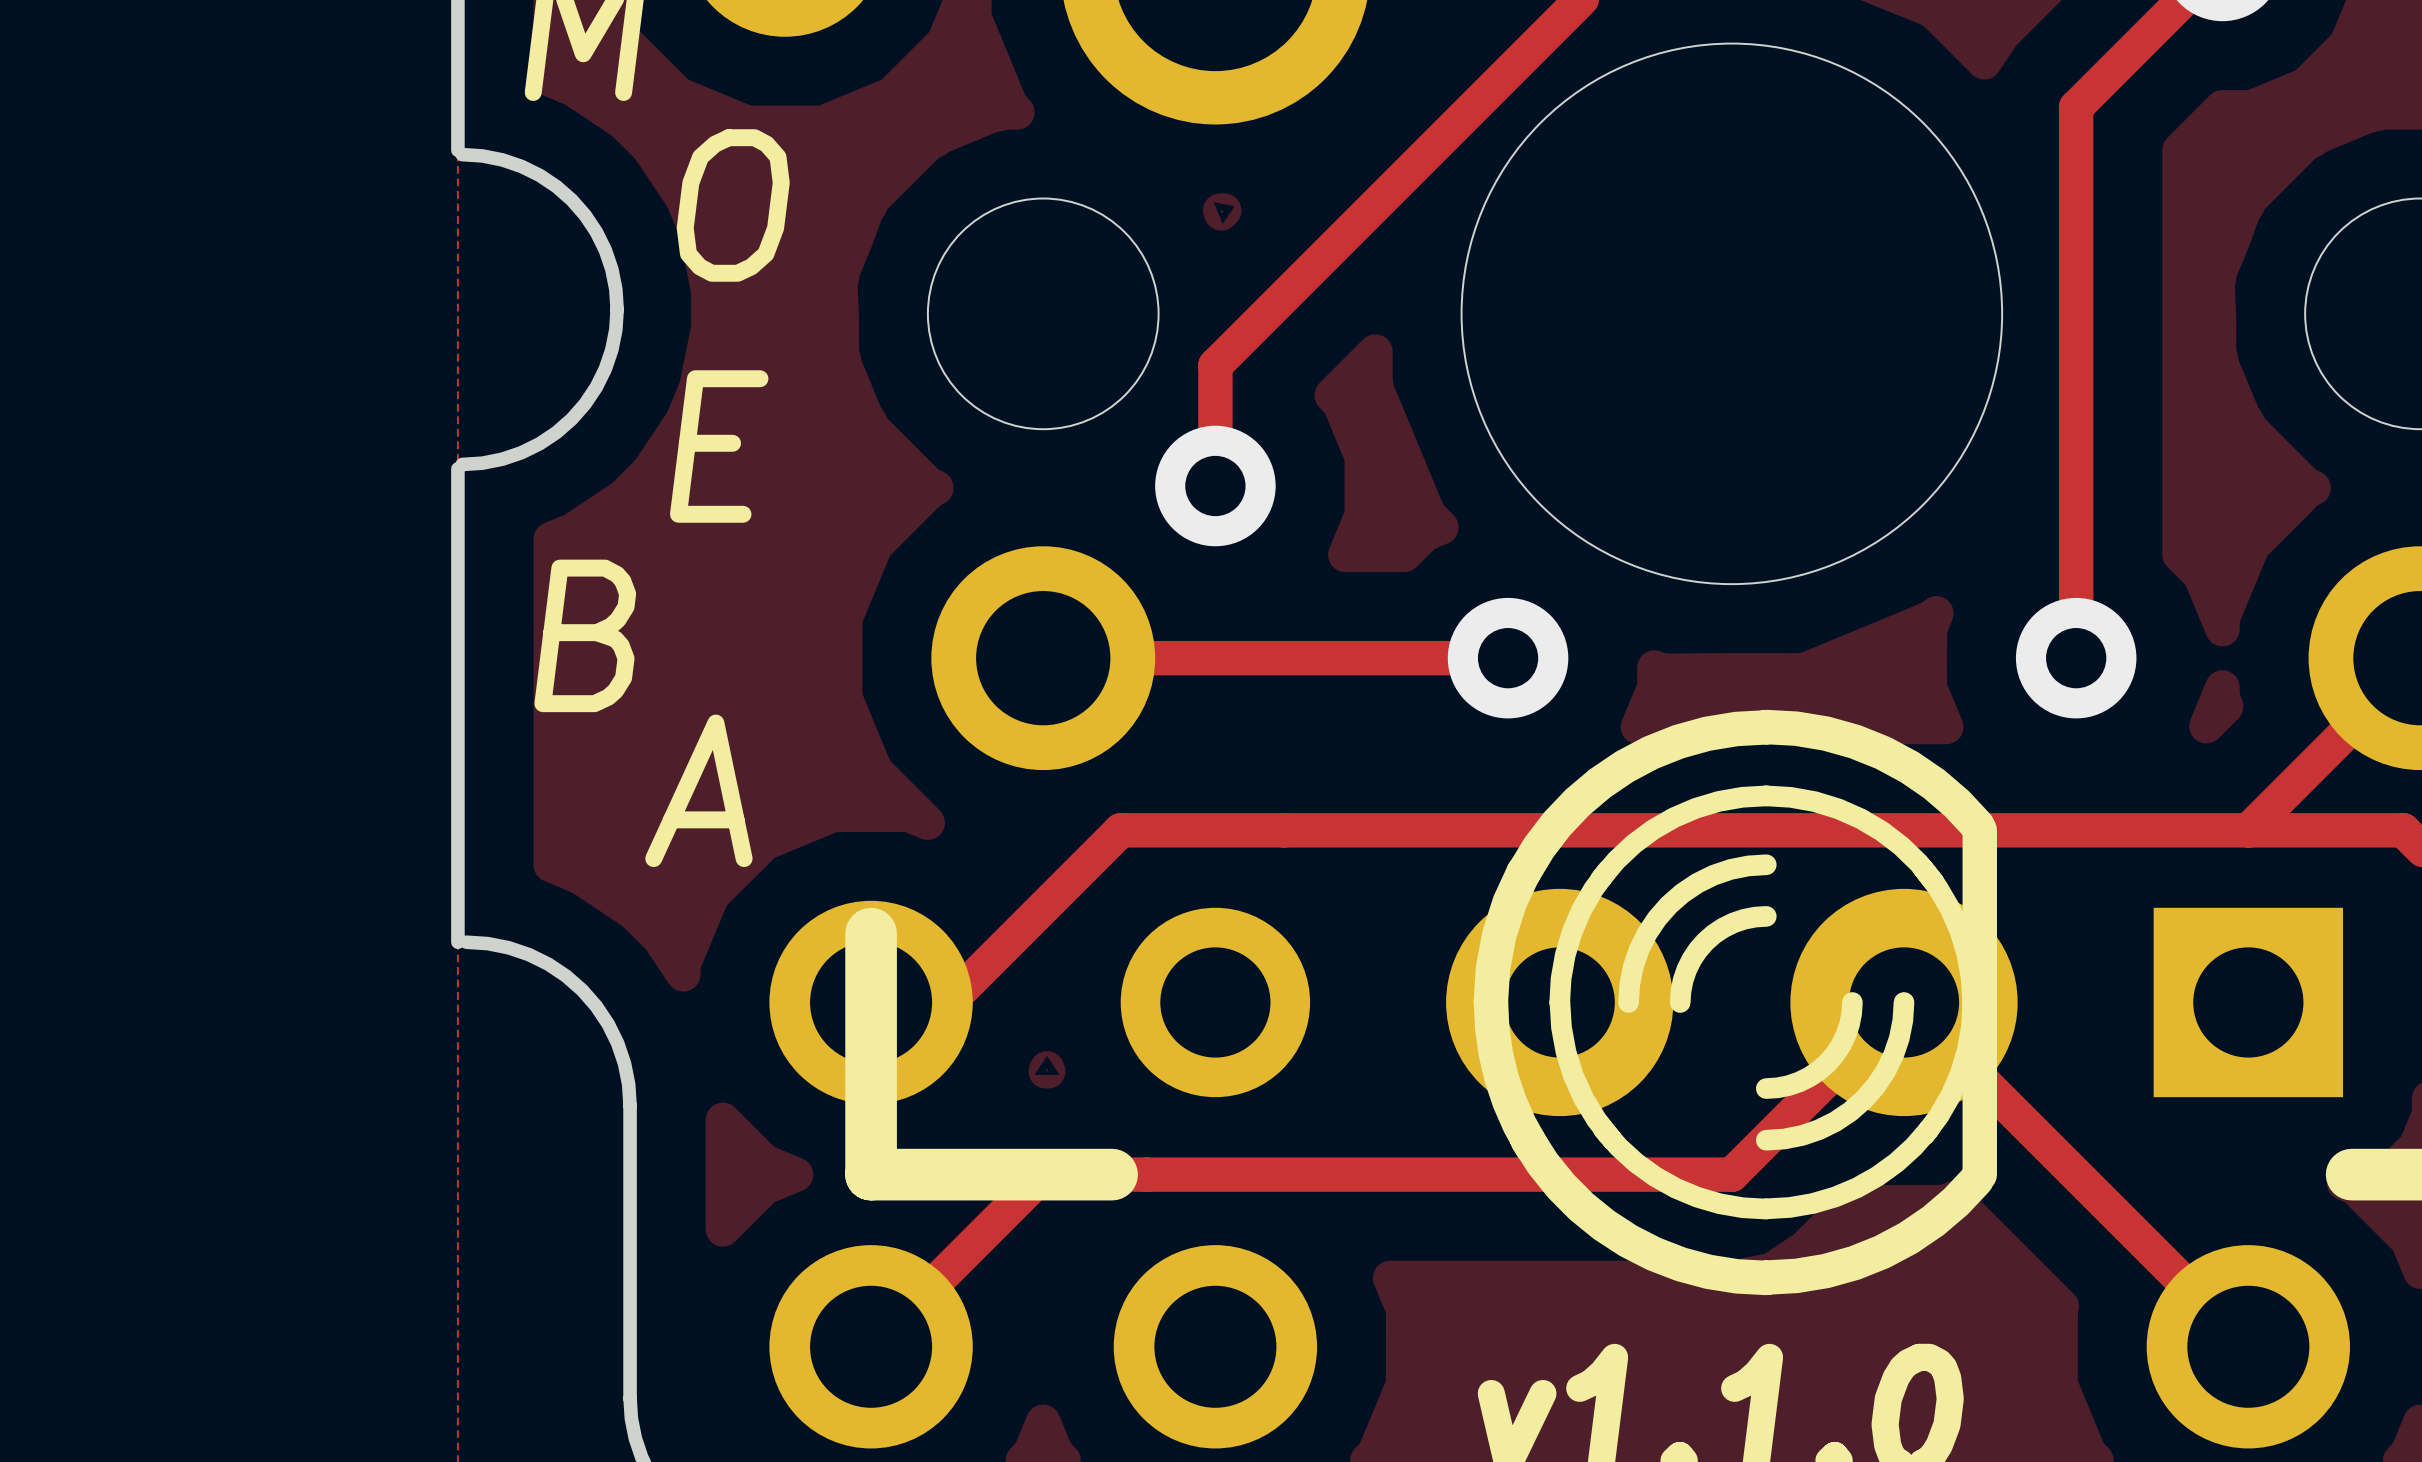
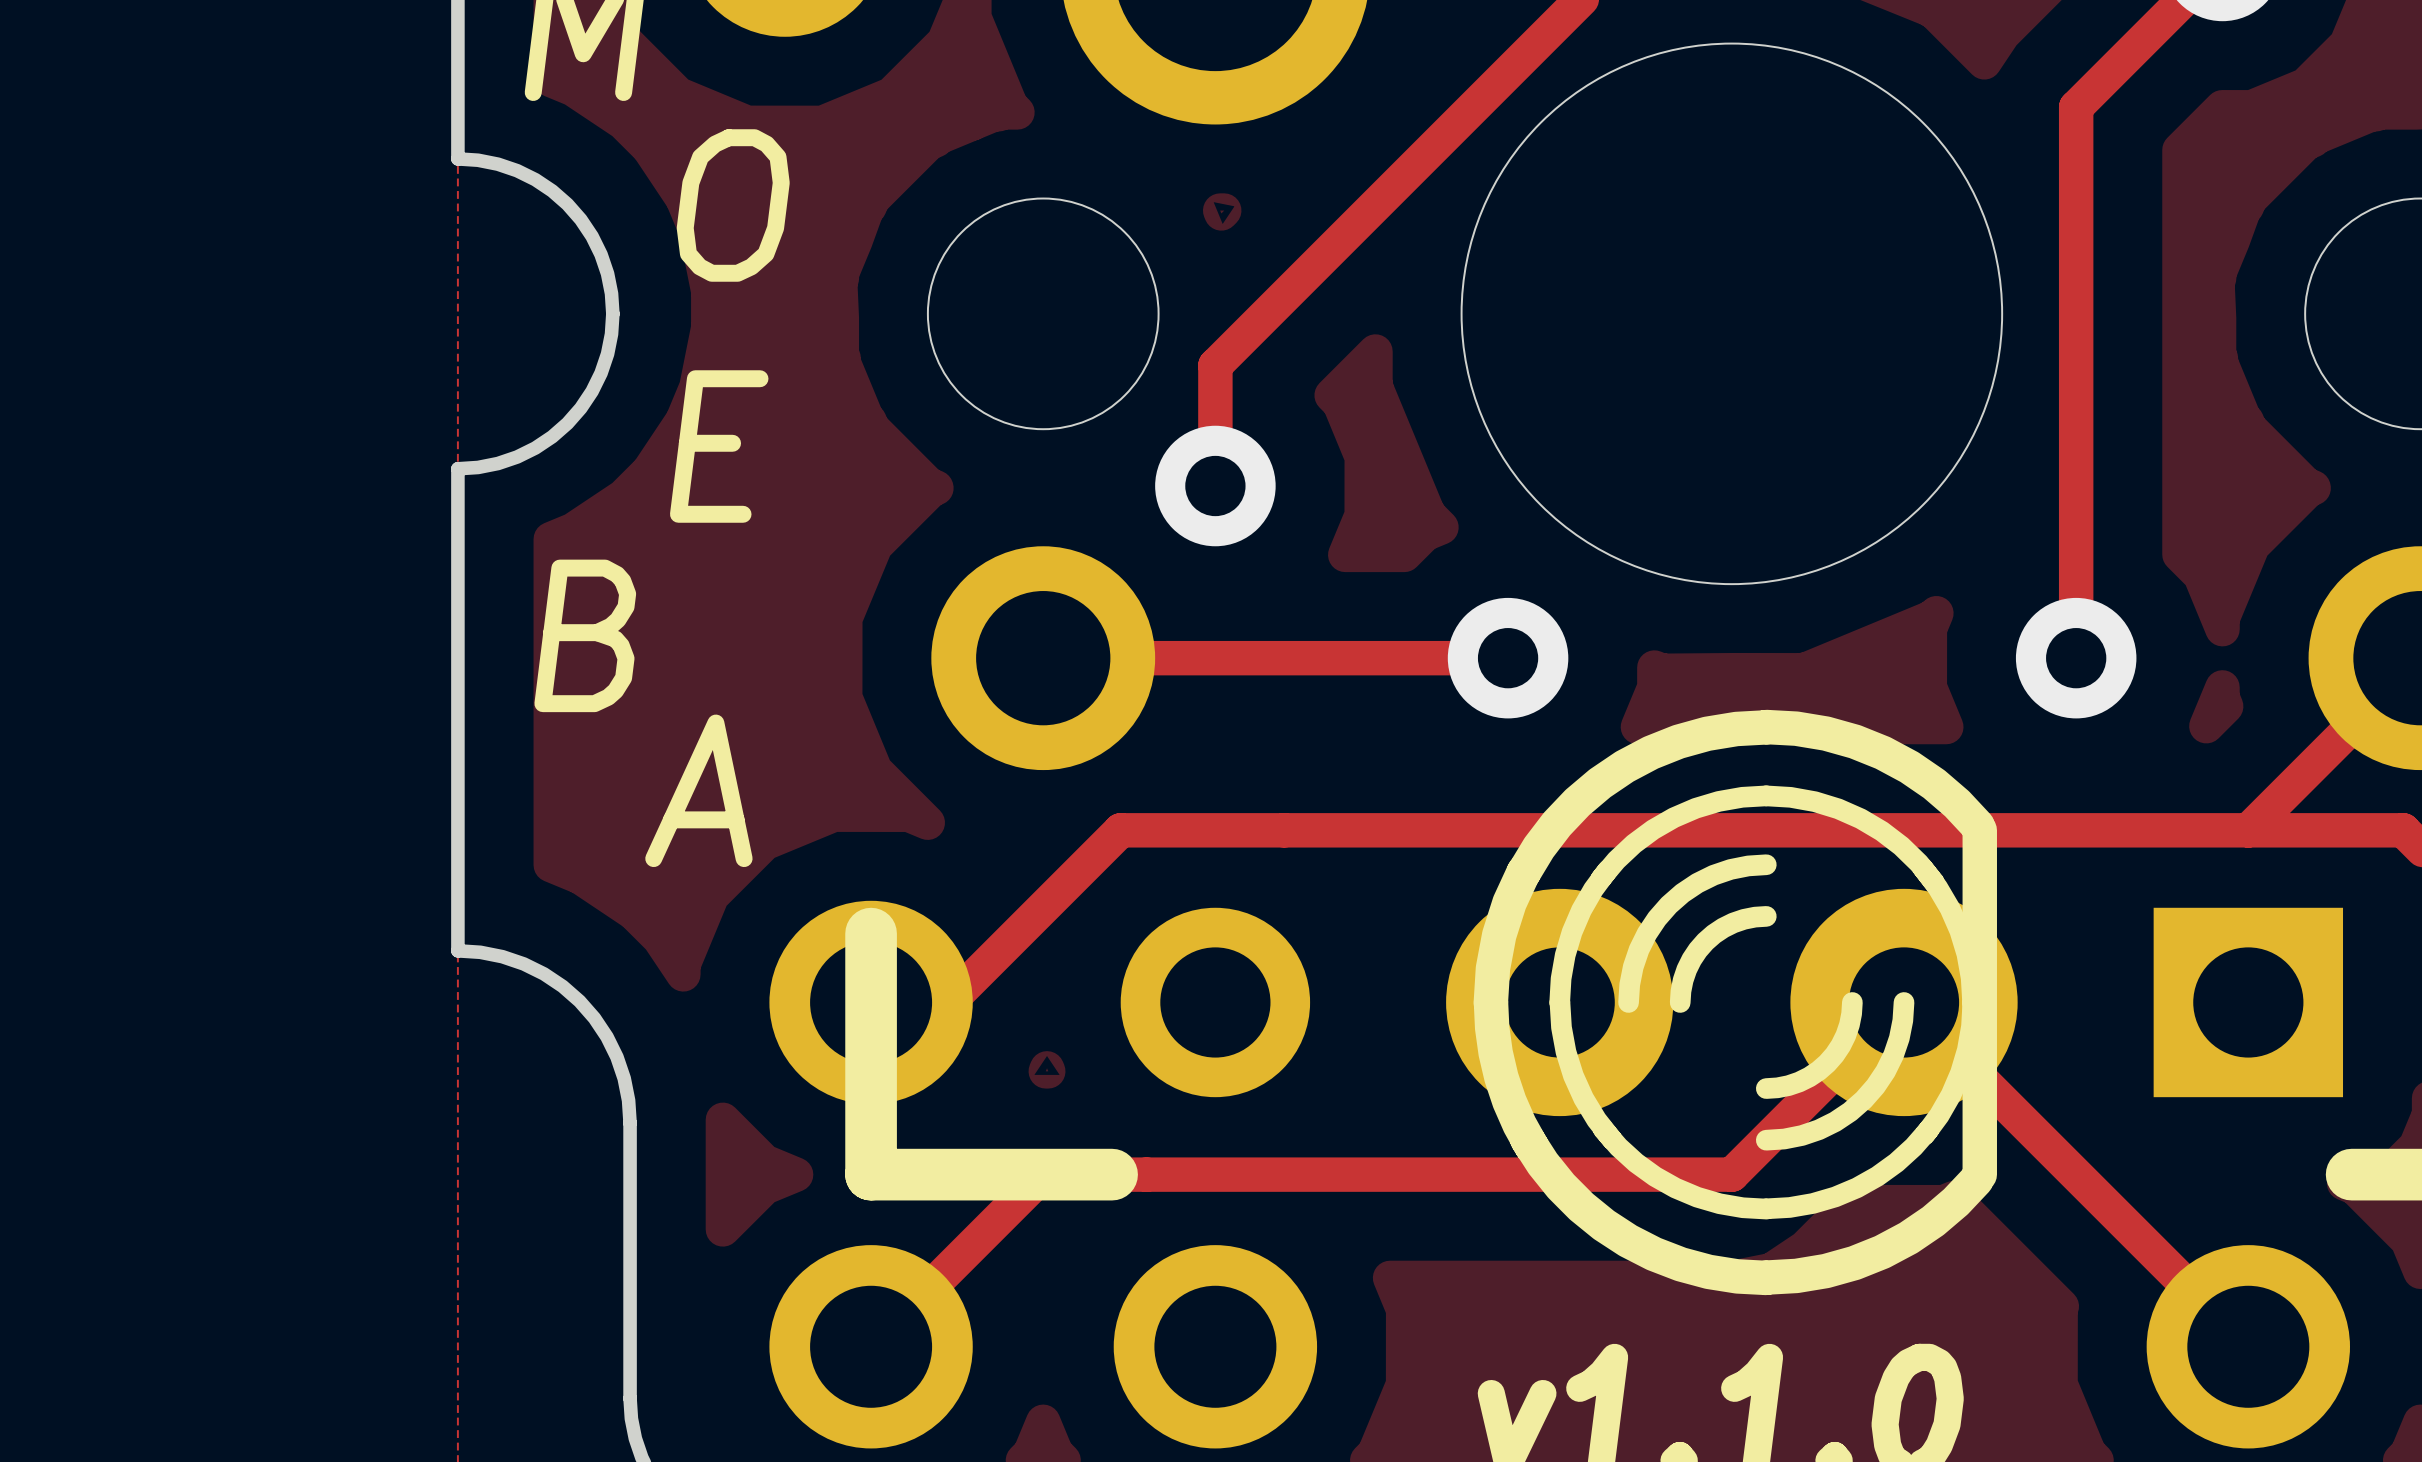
board edge: none -> (457, 150) (457, 158) (498, 164) (517, 170) (552, 190) (567, 204) (592, 236) (601, 254) (607, 273) (612, 313) (607, 353) (601, 373) (592, 391) (567, 423) (535, 448) (517, 457) (498, 463) (457, 468)
board edge: (462, 154) (502, 159) (521, 166) (556, 186) (571, 199) (596, 232) (605, 250) (611, 269) (617, 309) (611, 349) (605, 368) (596, 387) (571, 419) (539, 443) (521, 452) (502, 459) (462, 464) -> none
board edge: (466, 942) (508, 947) (529, 954) (548, 964) (582, 990) (596, 1006) (617, 1043) (628, 1084) (630, 1122) -> (457, 942) (457, 950) (480, 952) (523, 963) (562, 986) (579, 1001) (607, 1036) (616, 1057) (624, 1078) (630, 1122)

